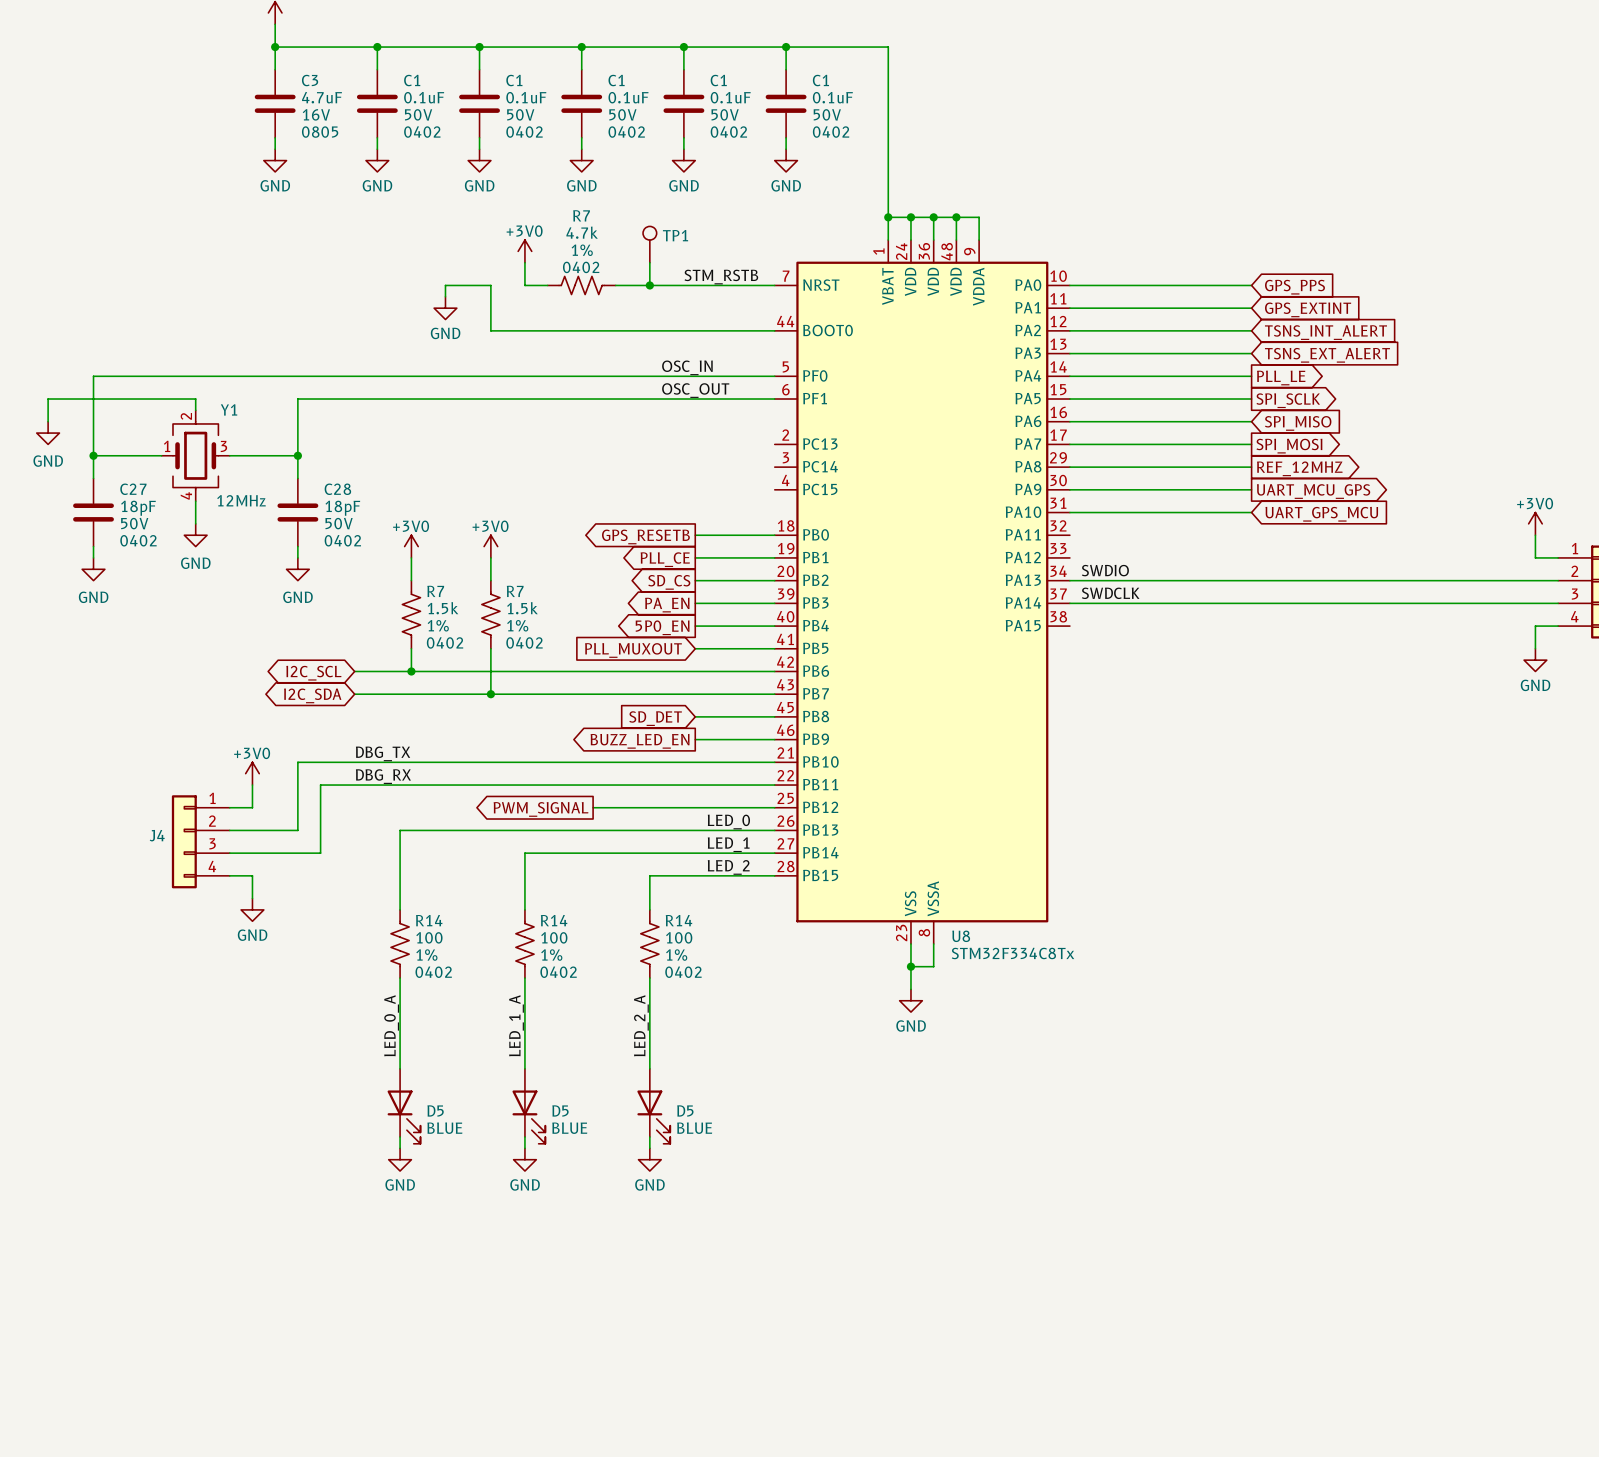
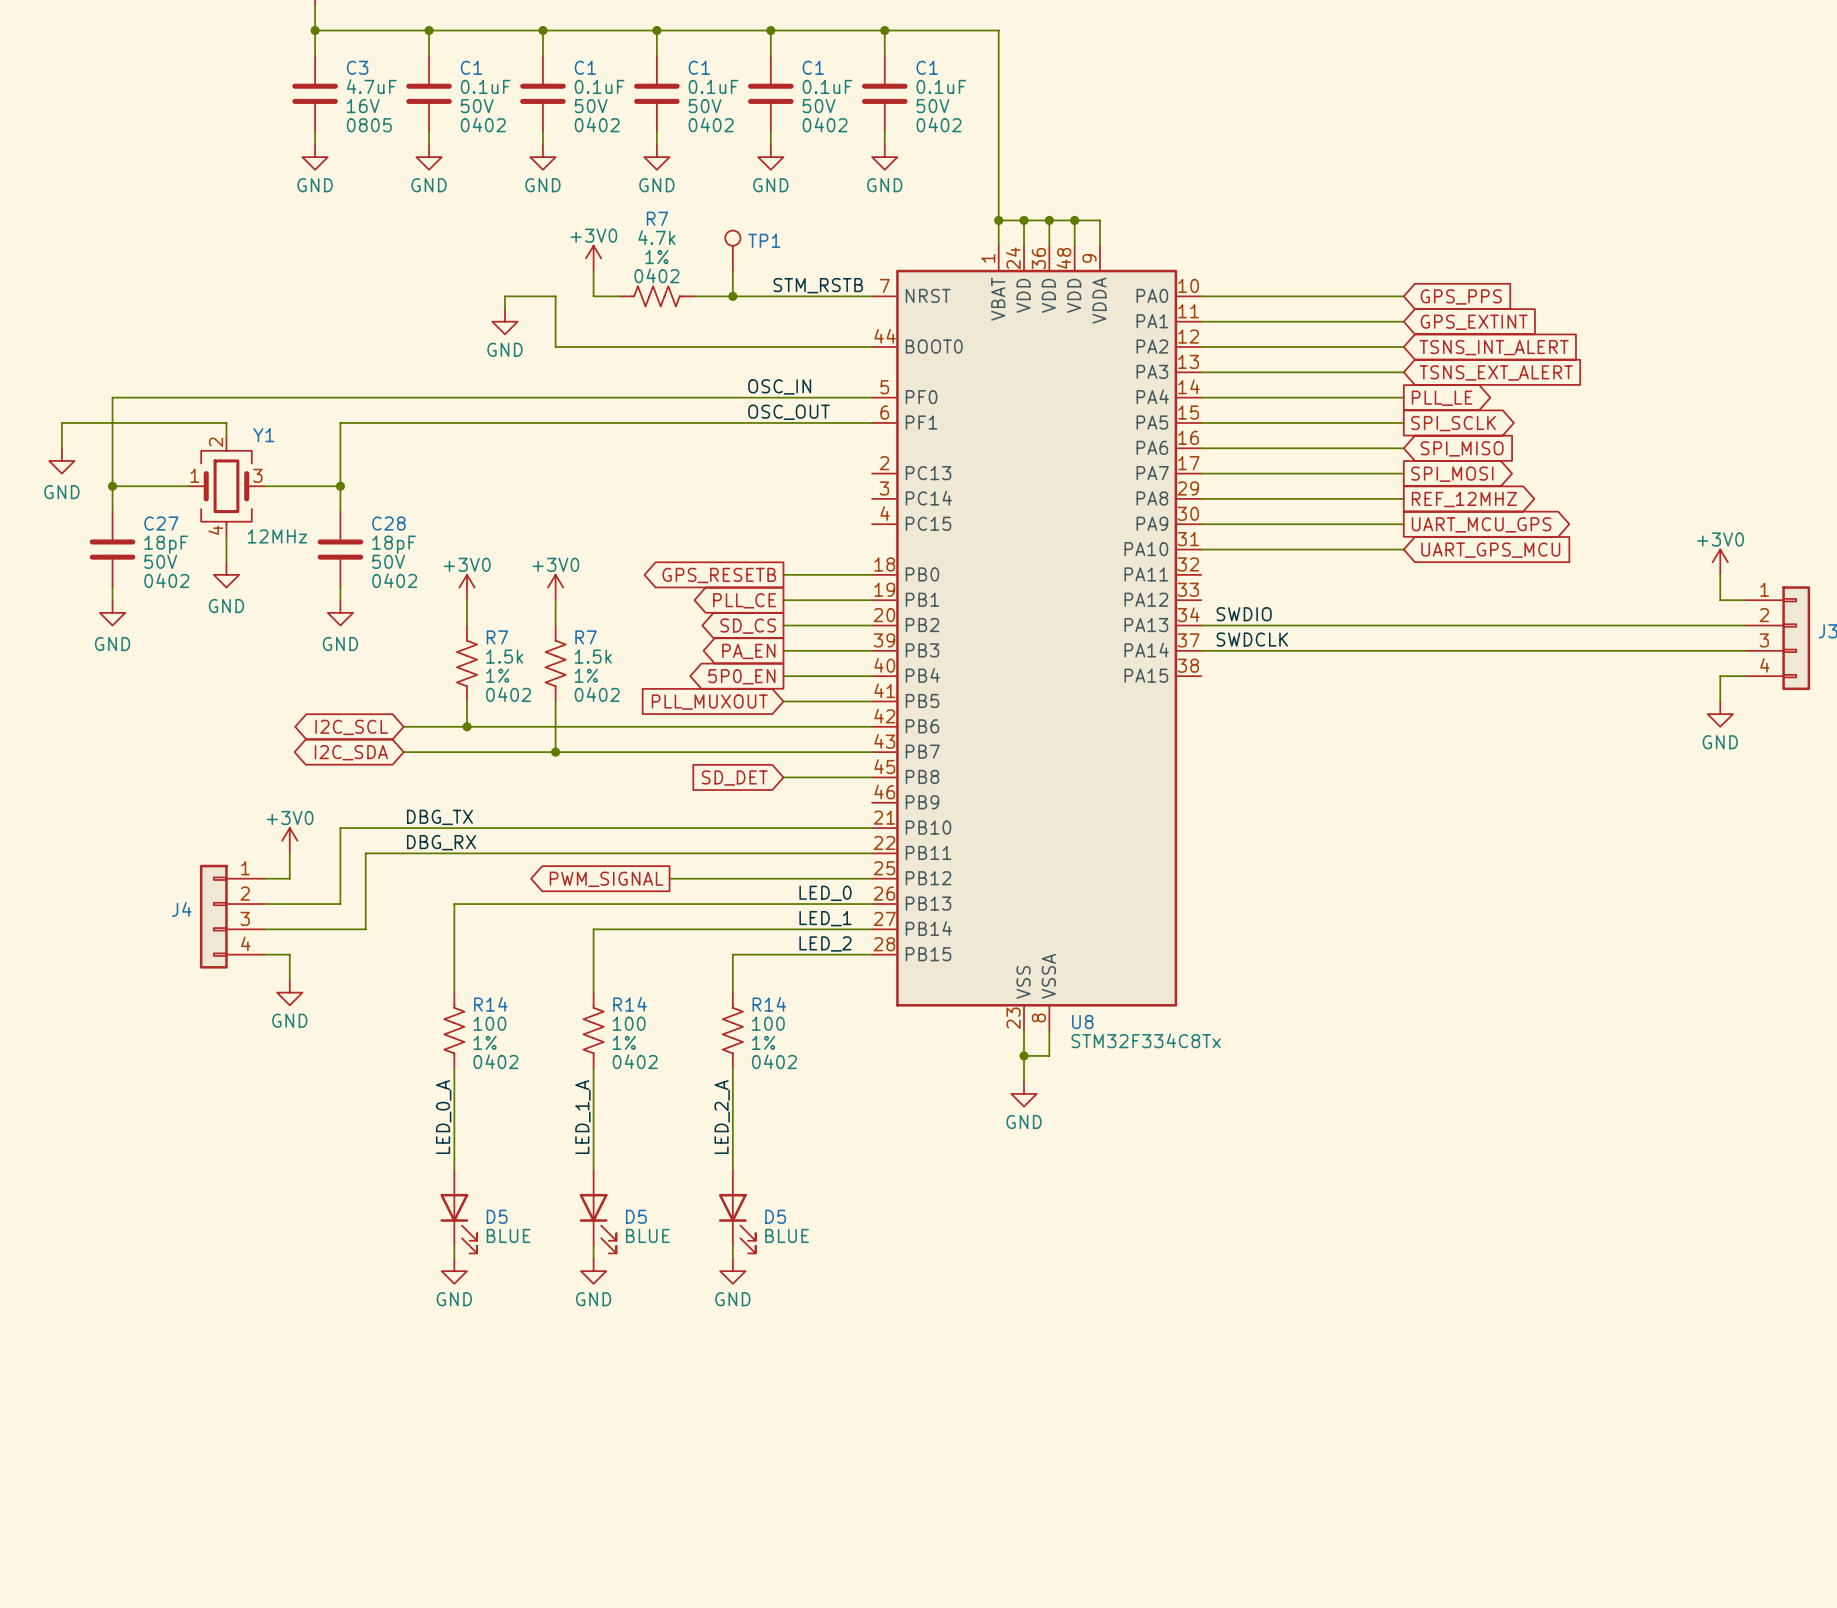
wire: (695, 739) (774, 739) -> none
global label: BUZZ_LED_EN (640, 741) -> none

